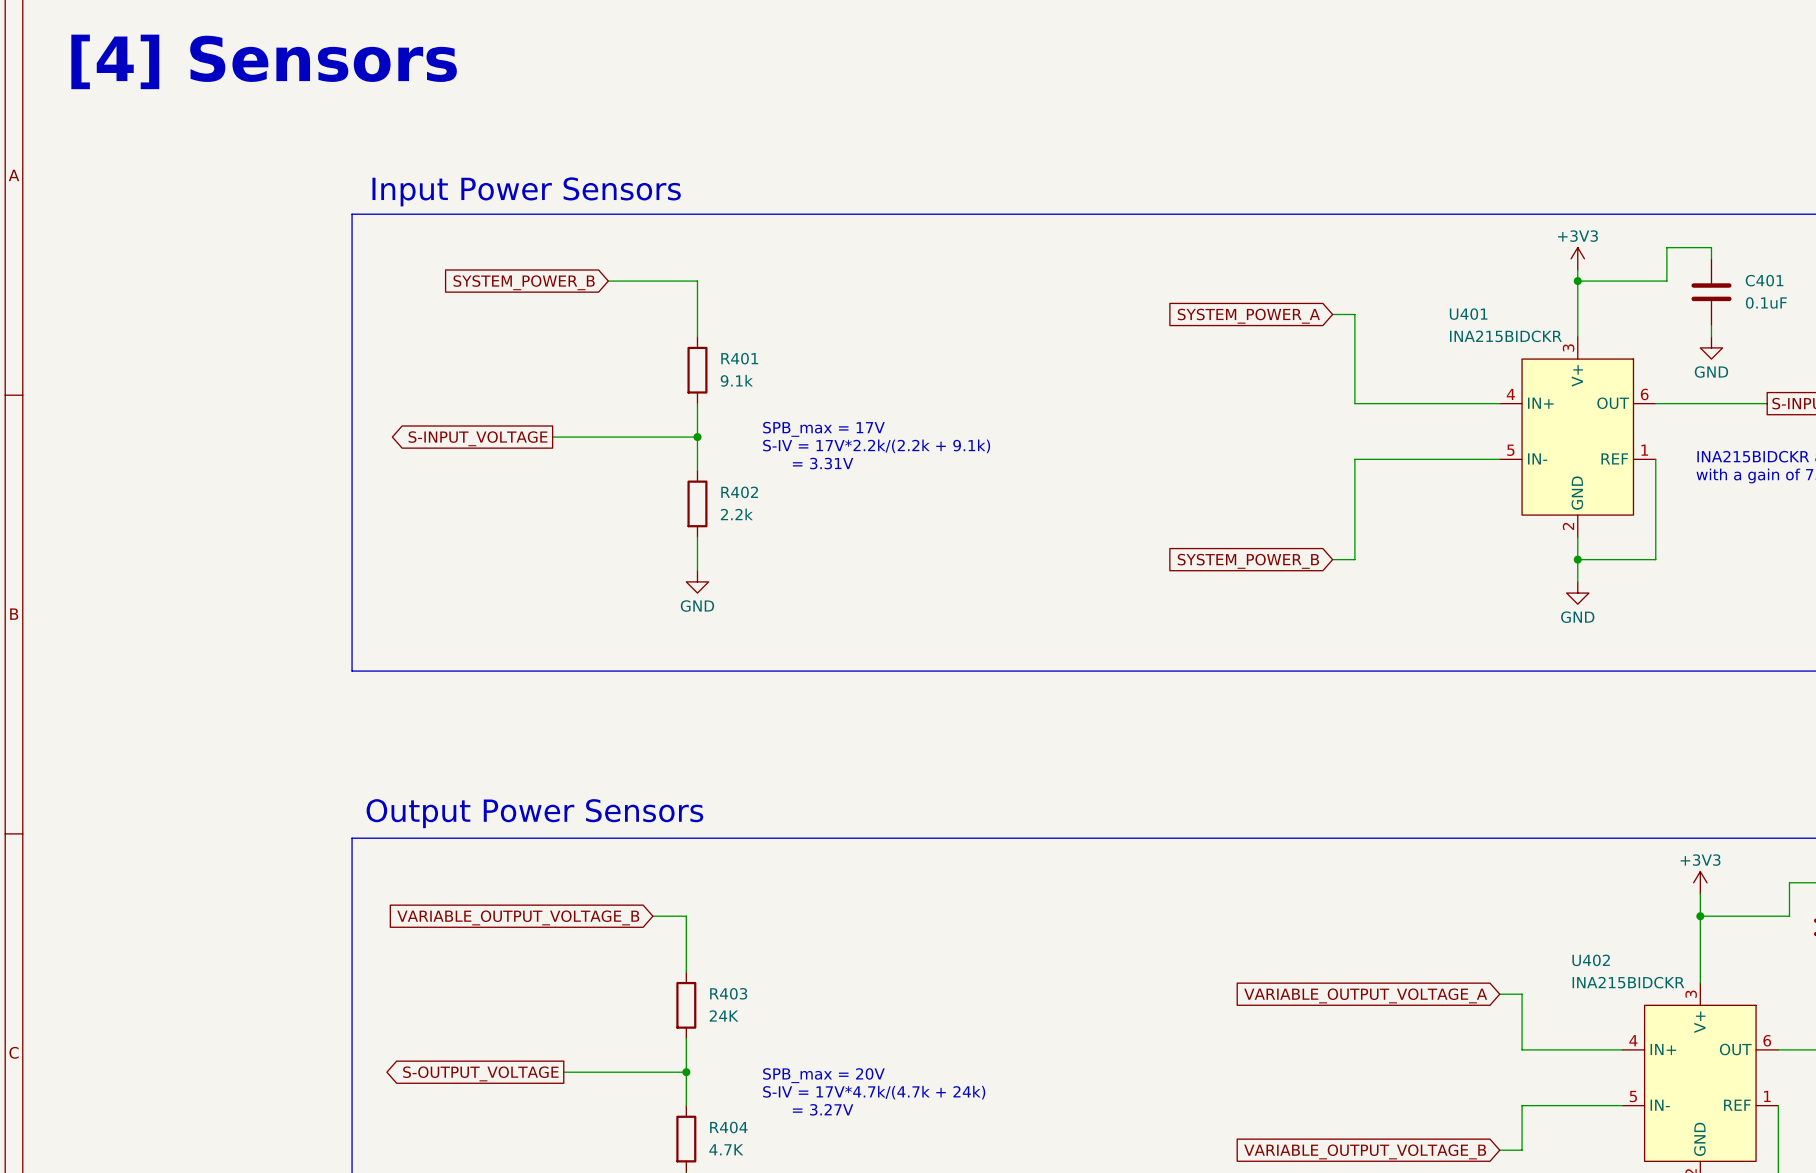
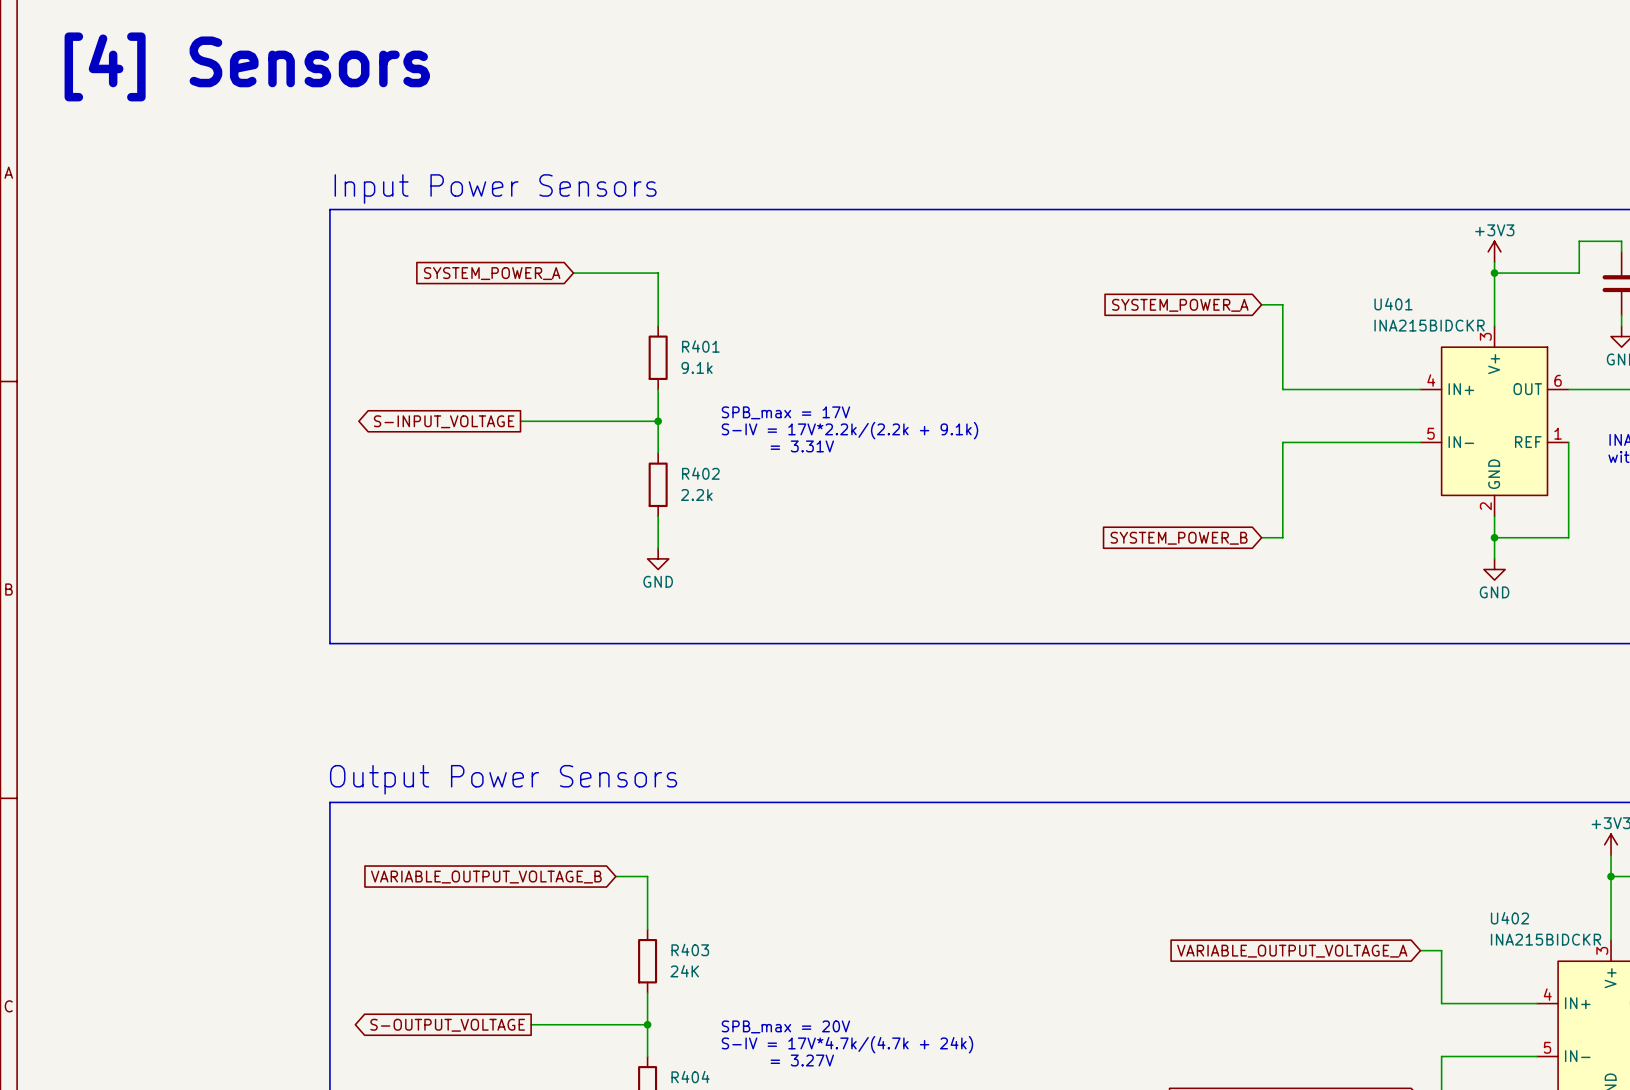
global label: SYSTEM_POWER_B (524, 282) -> SYSTEM_POWER_A (492, 273)

